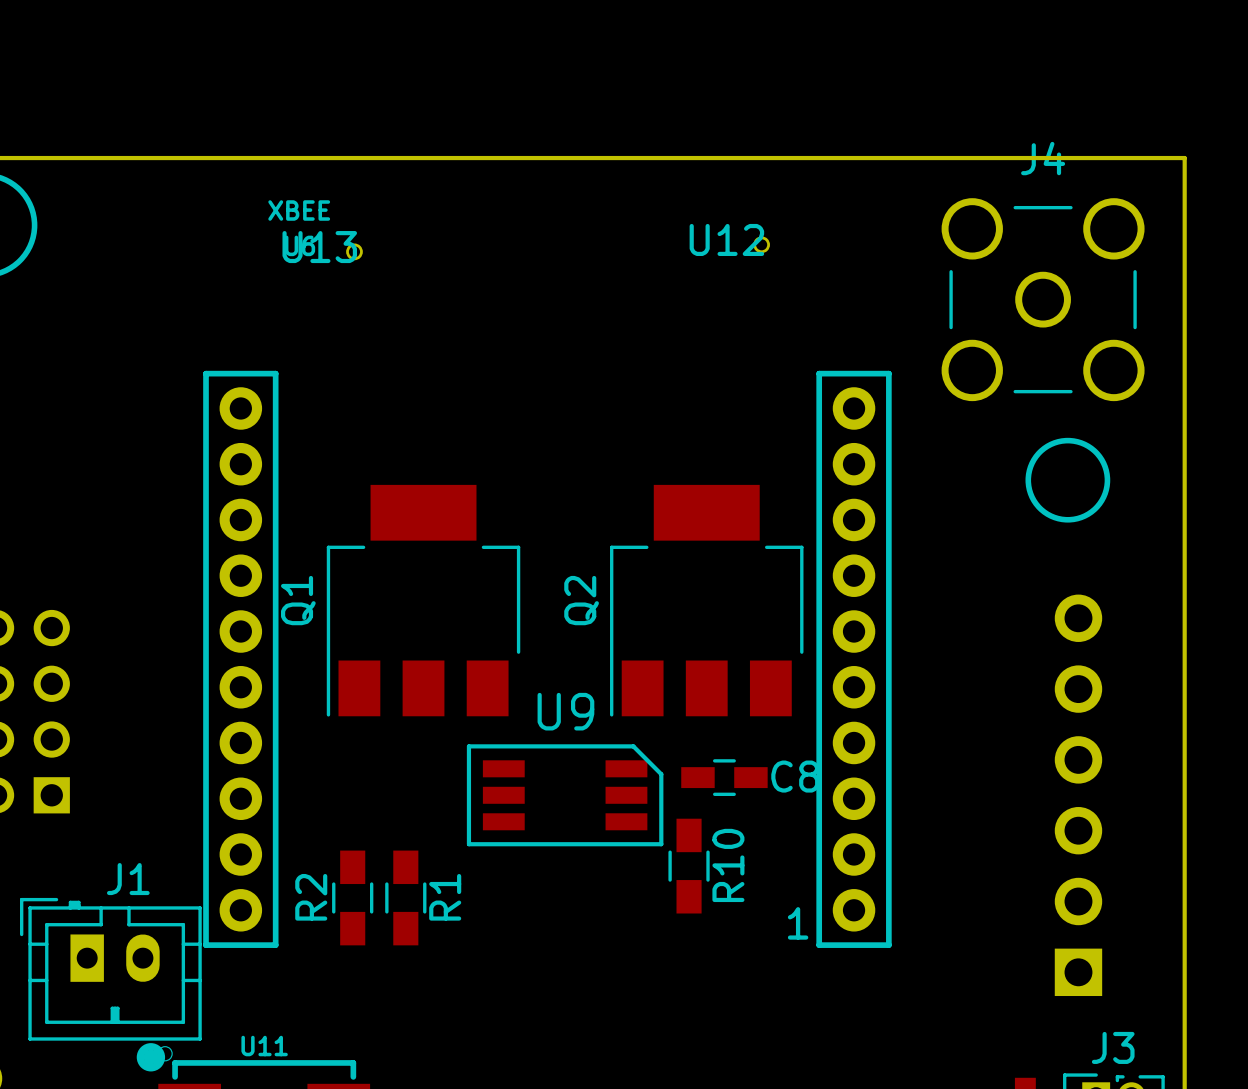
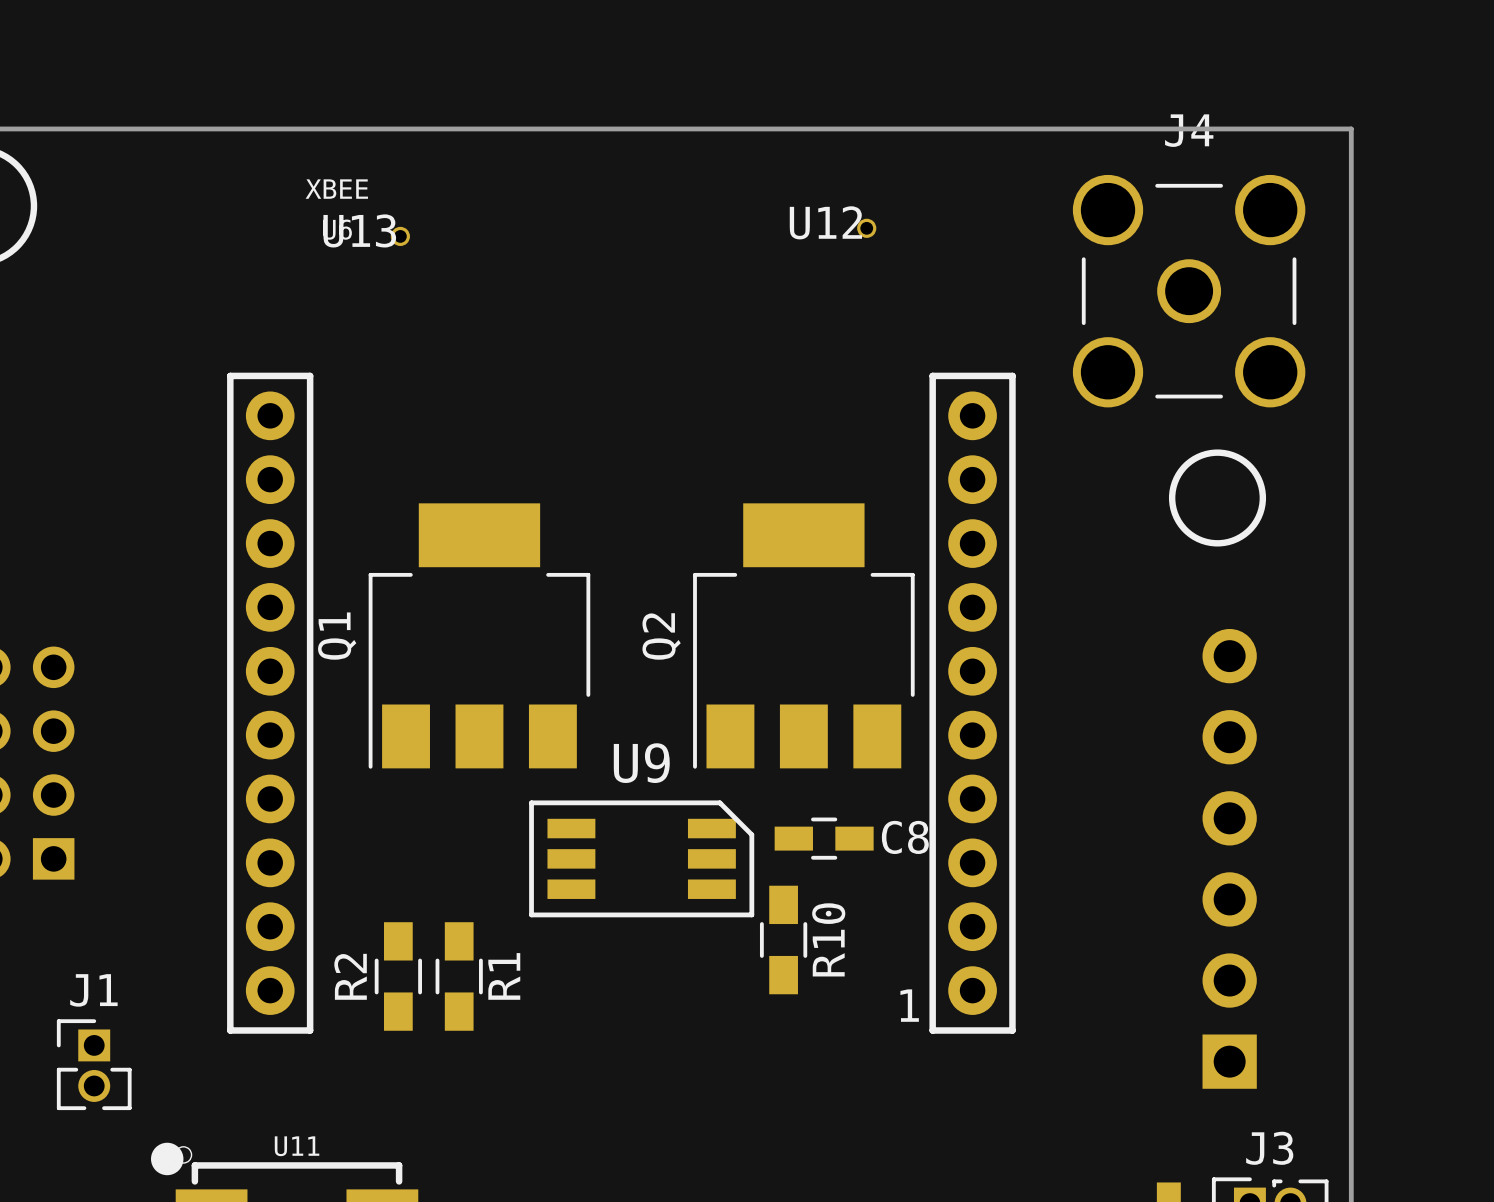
J1 footprint: [20, 897, 202, 1041] -> [56, 1019, 132, 1111]

